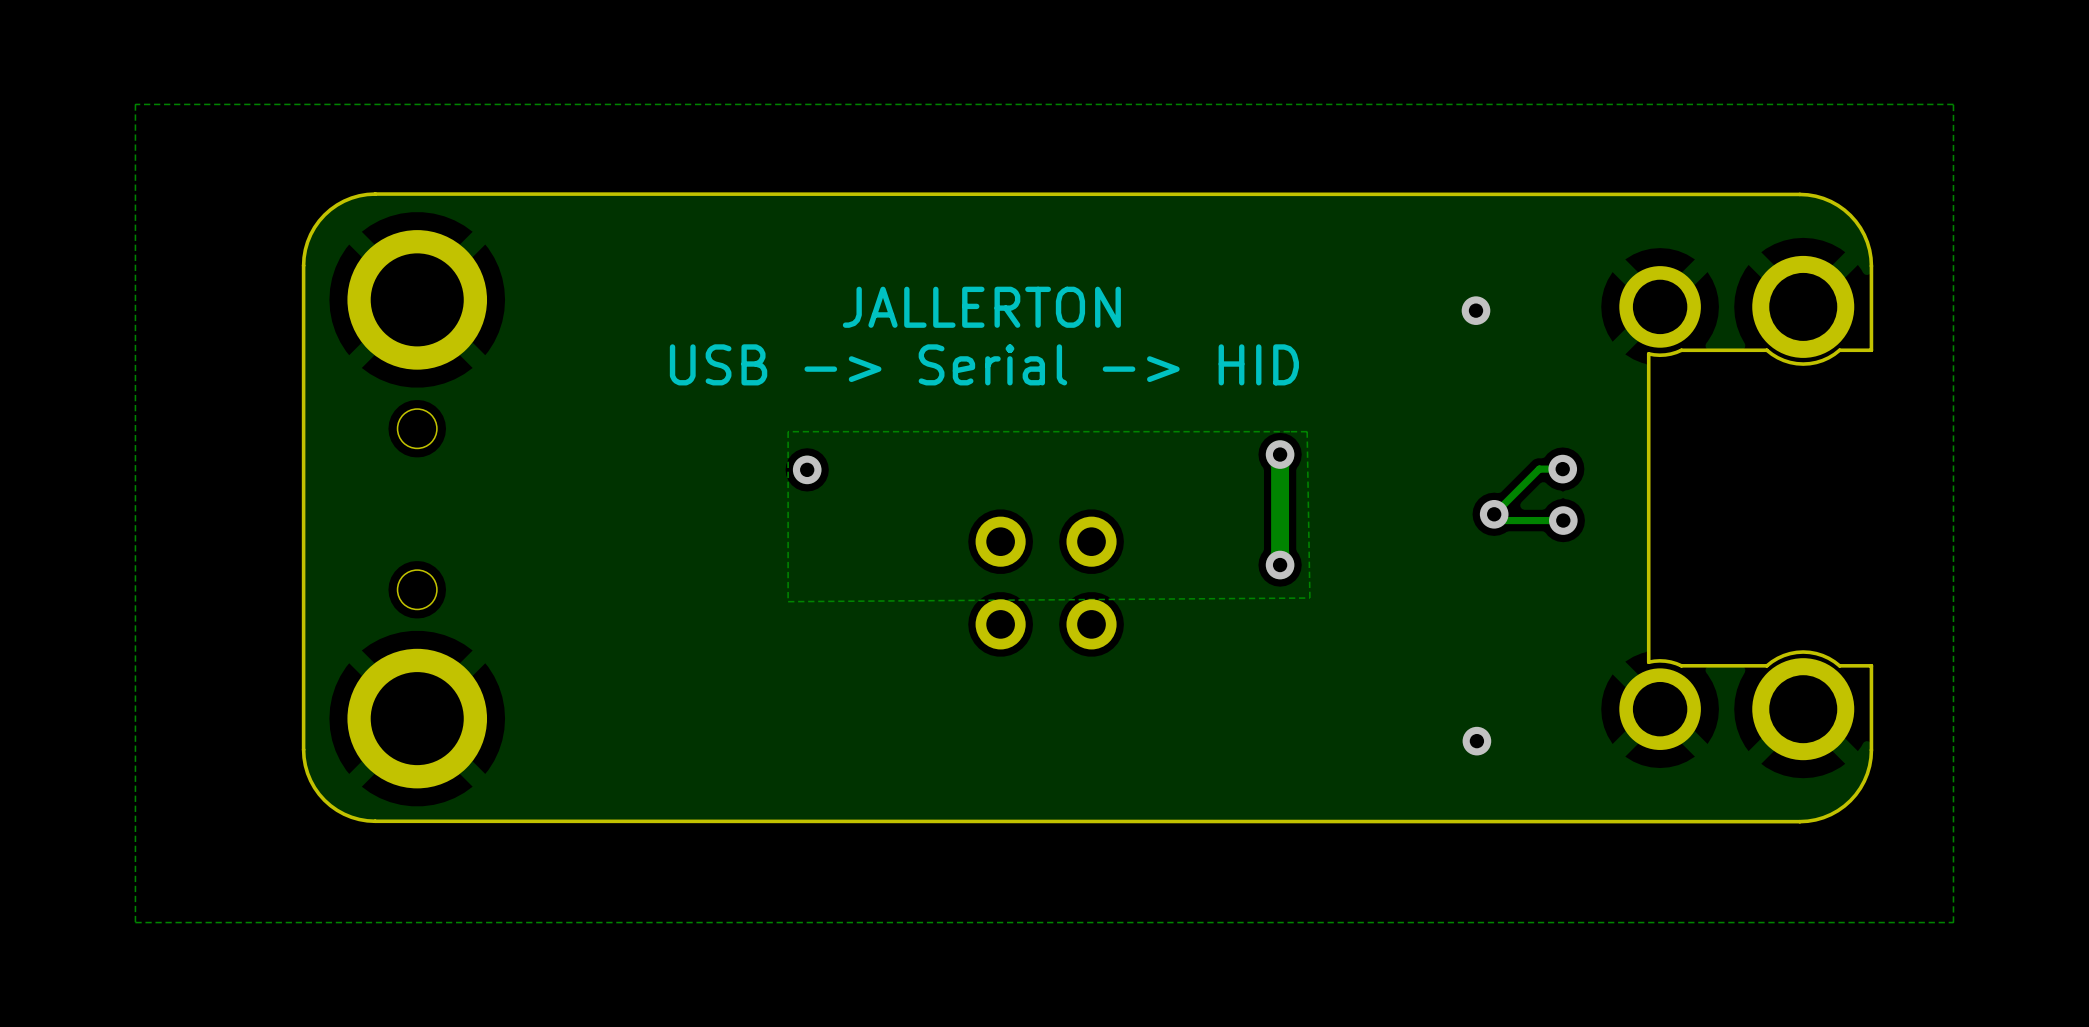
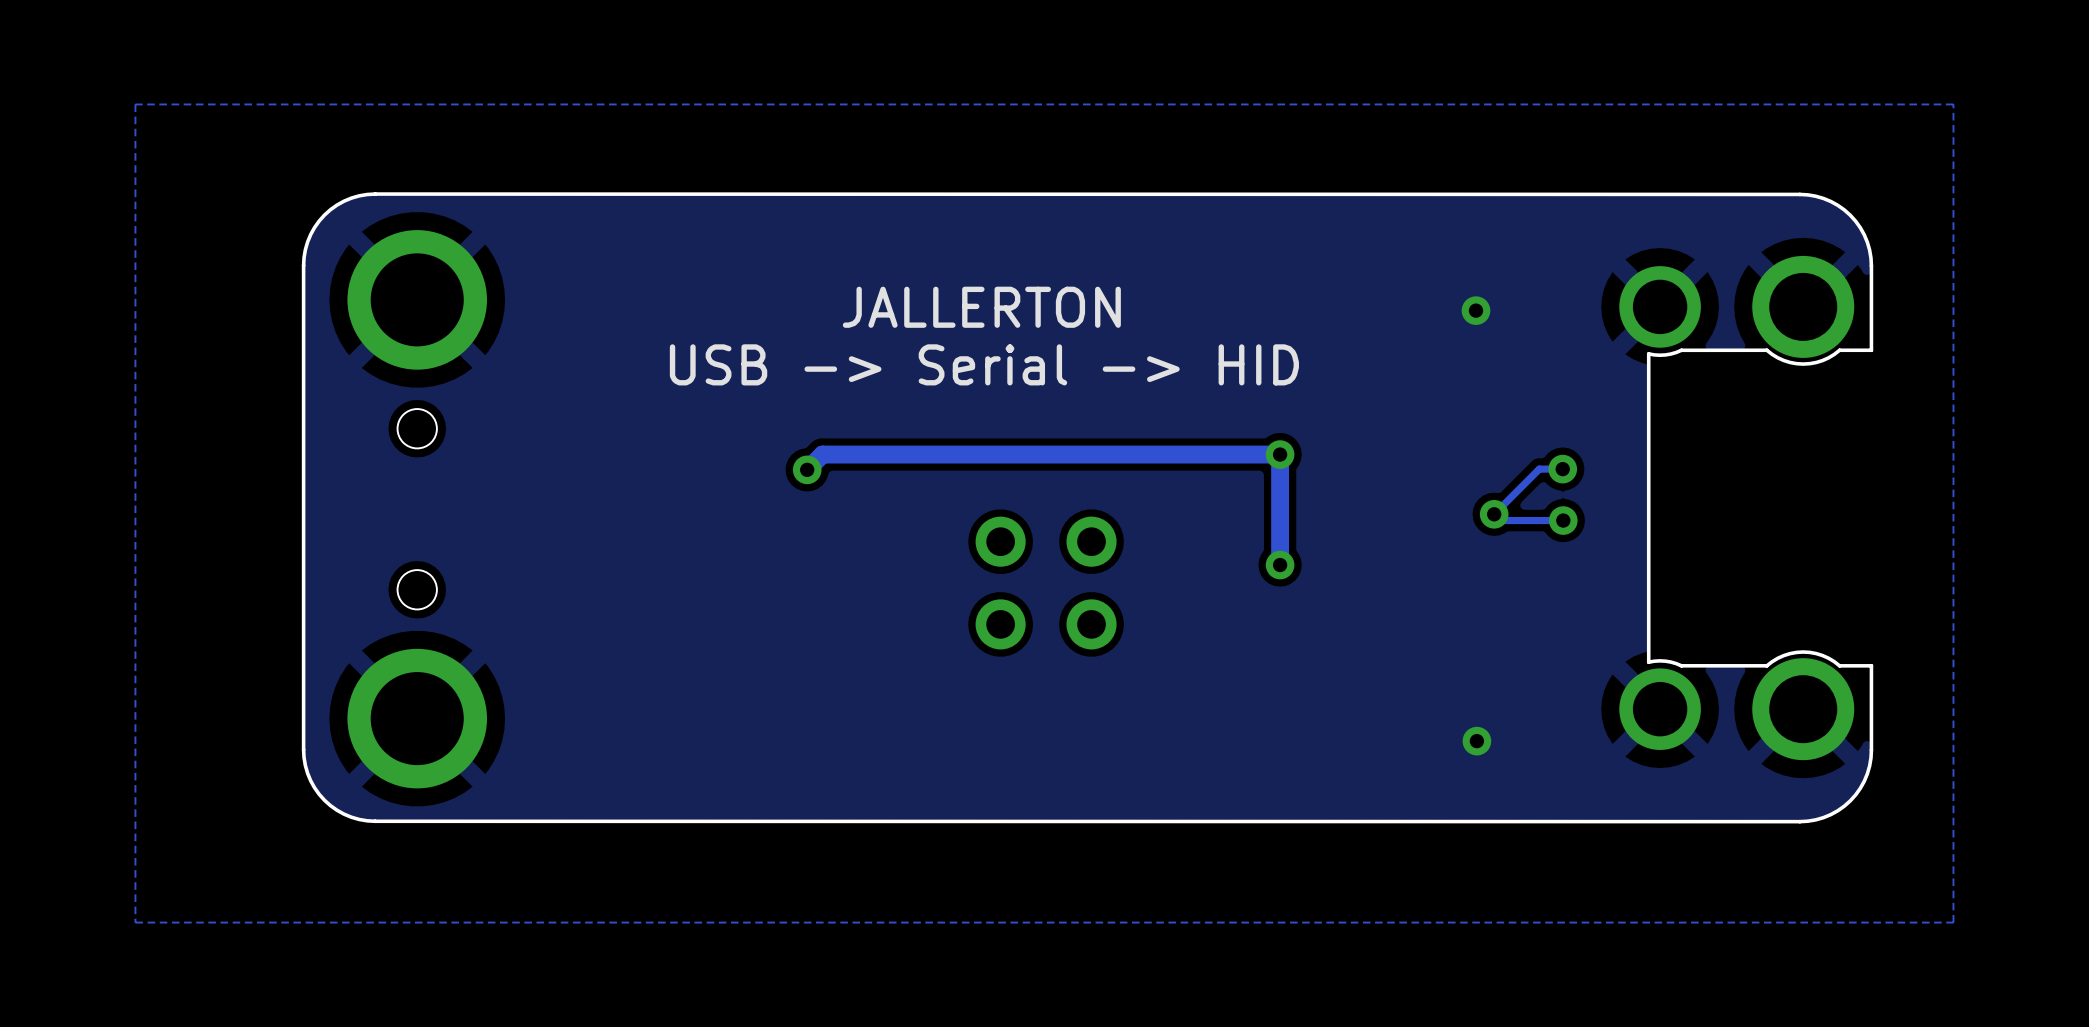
zone outline: (1307, 431) (1309, 598) (788, 601) (788, 431) (1307, 431) -> none
track: none -> (1280, 454) (822, 454) (807, 469)

